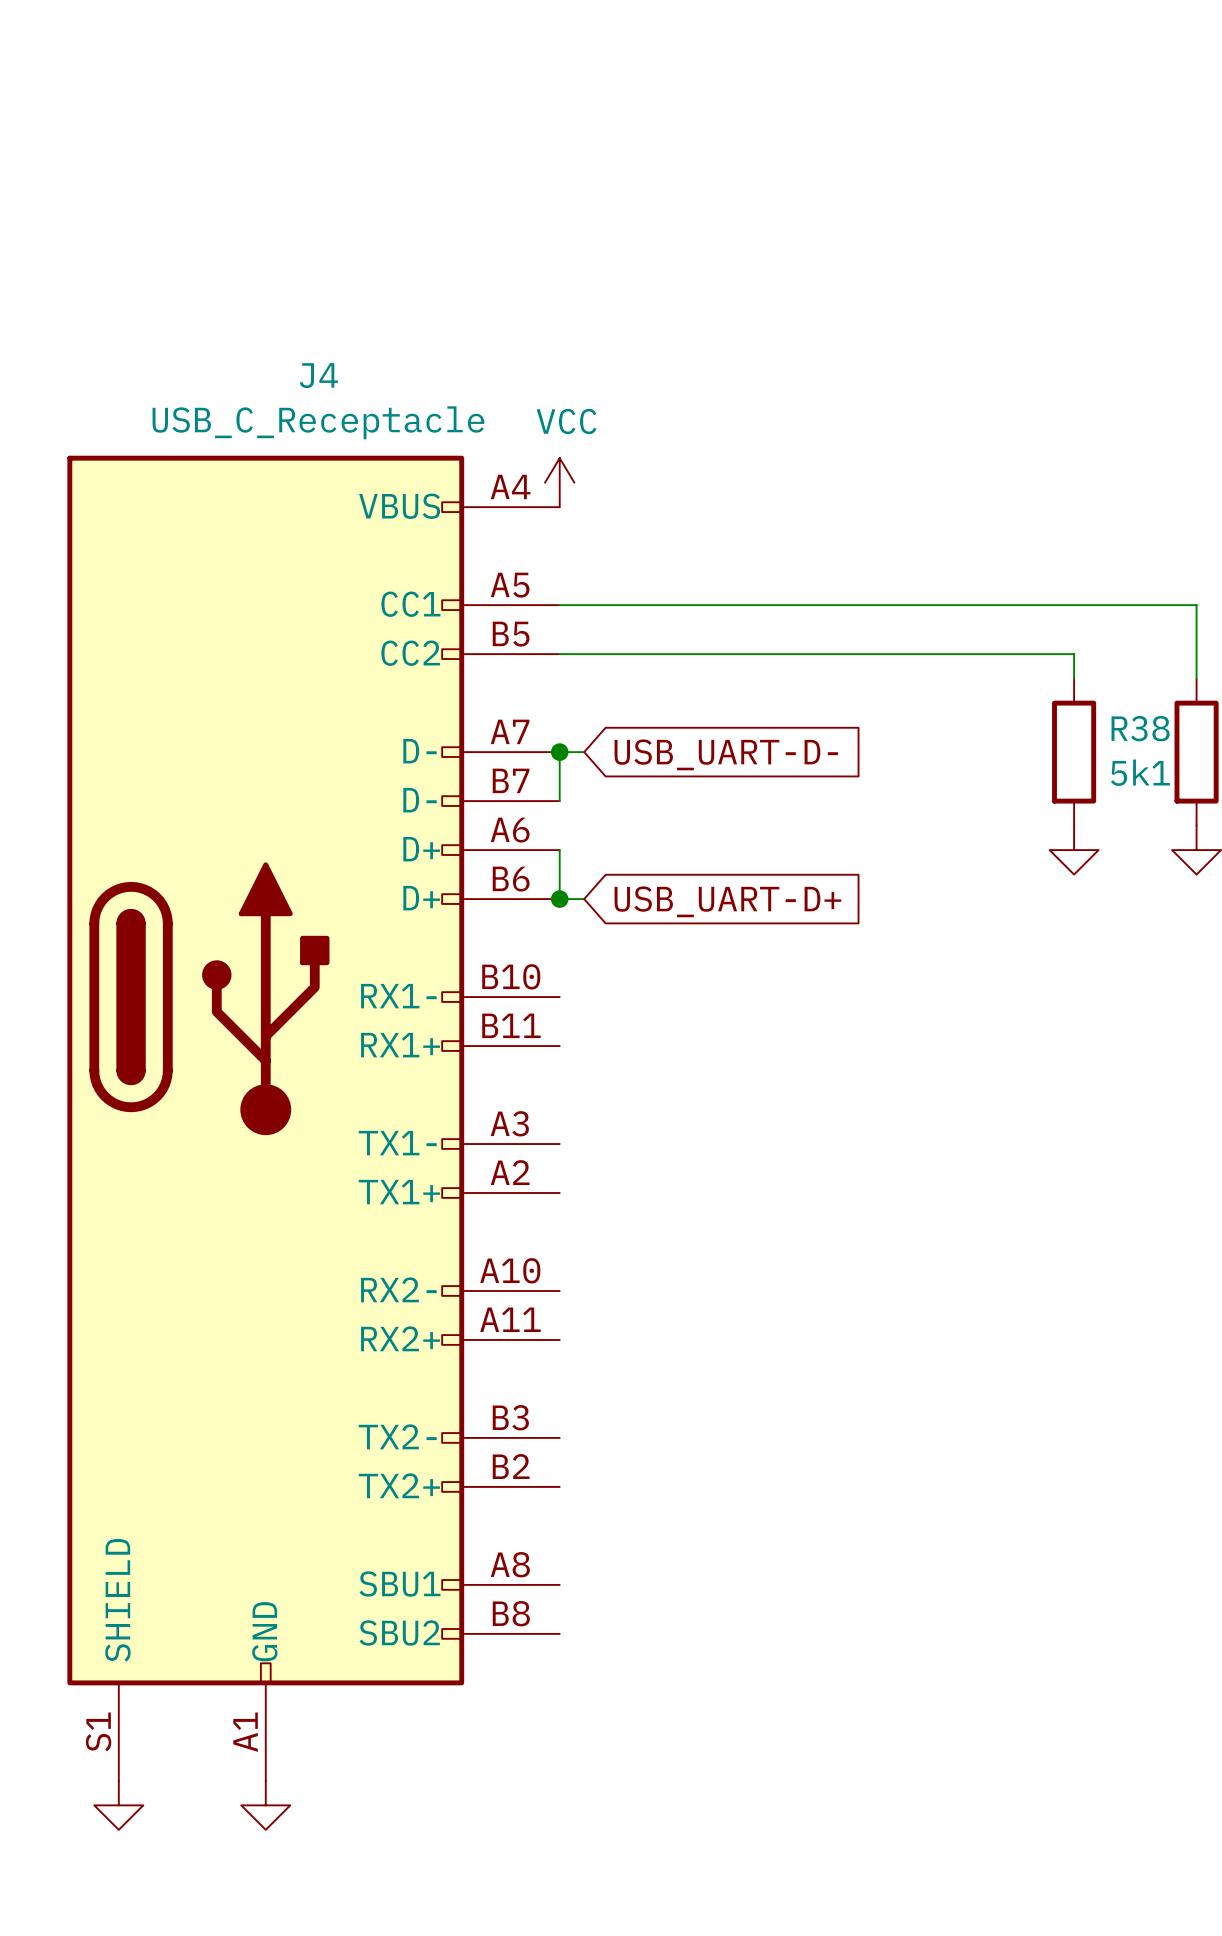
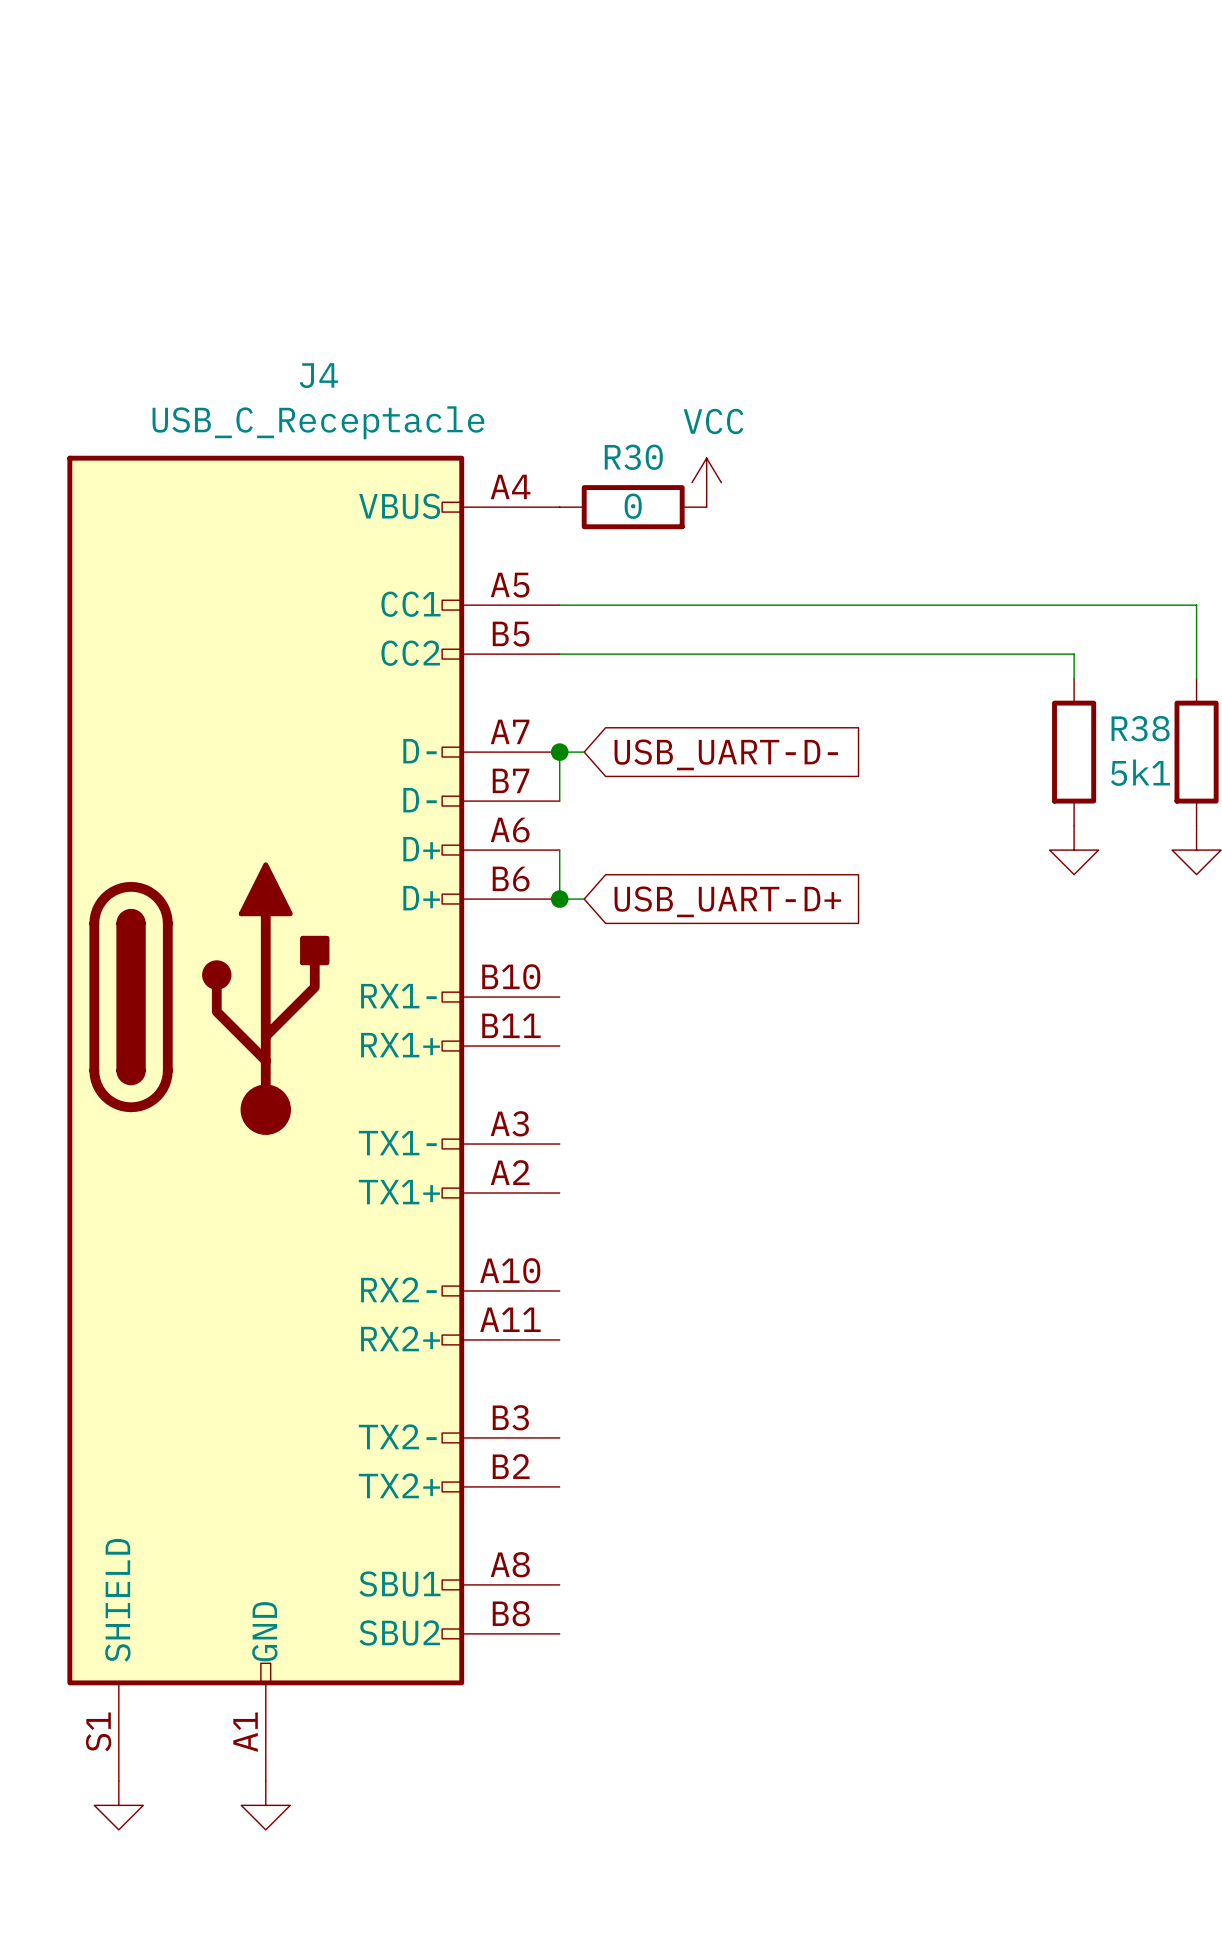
power symbol position: VCC (559, 482) -> VCC (706, 482)
R30: none -> 0 (633, 507)

